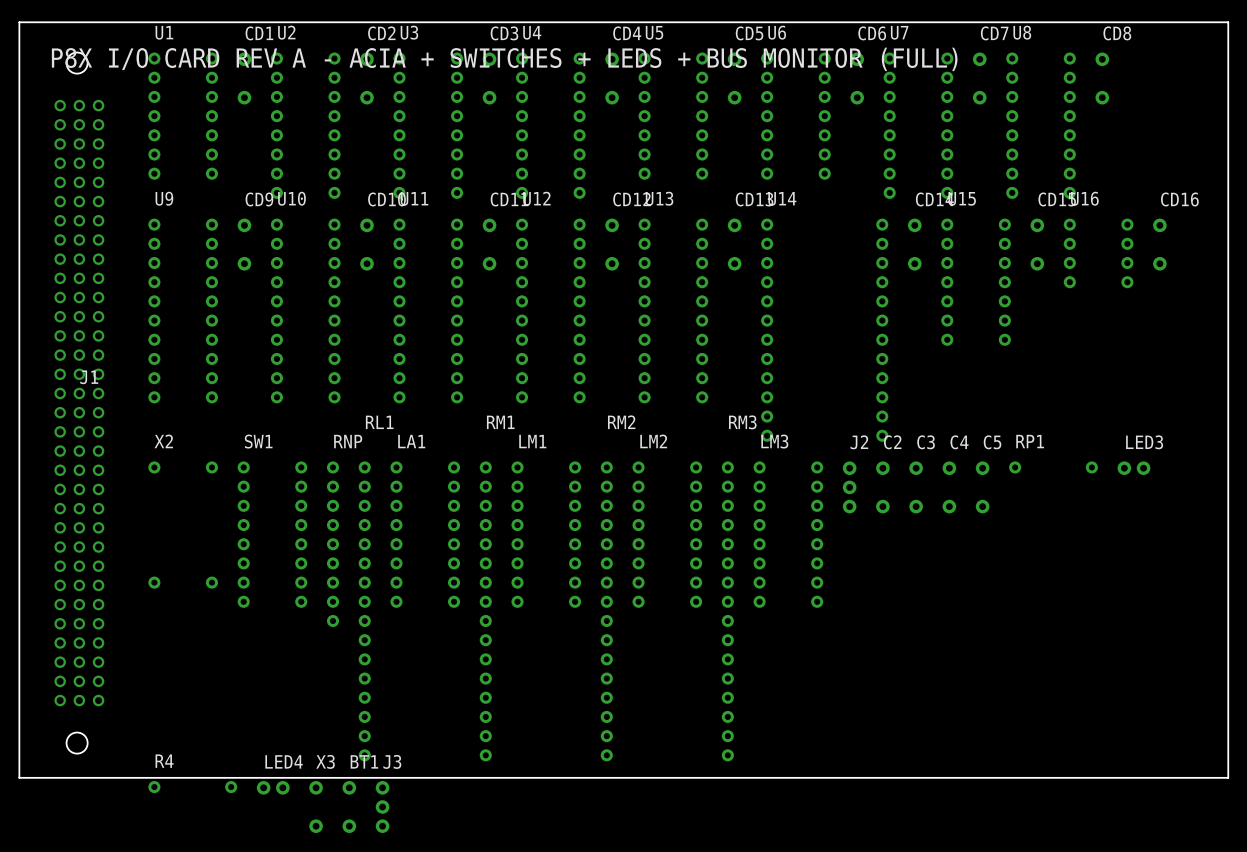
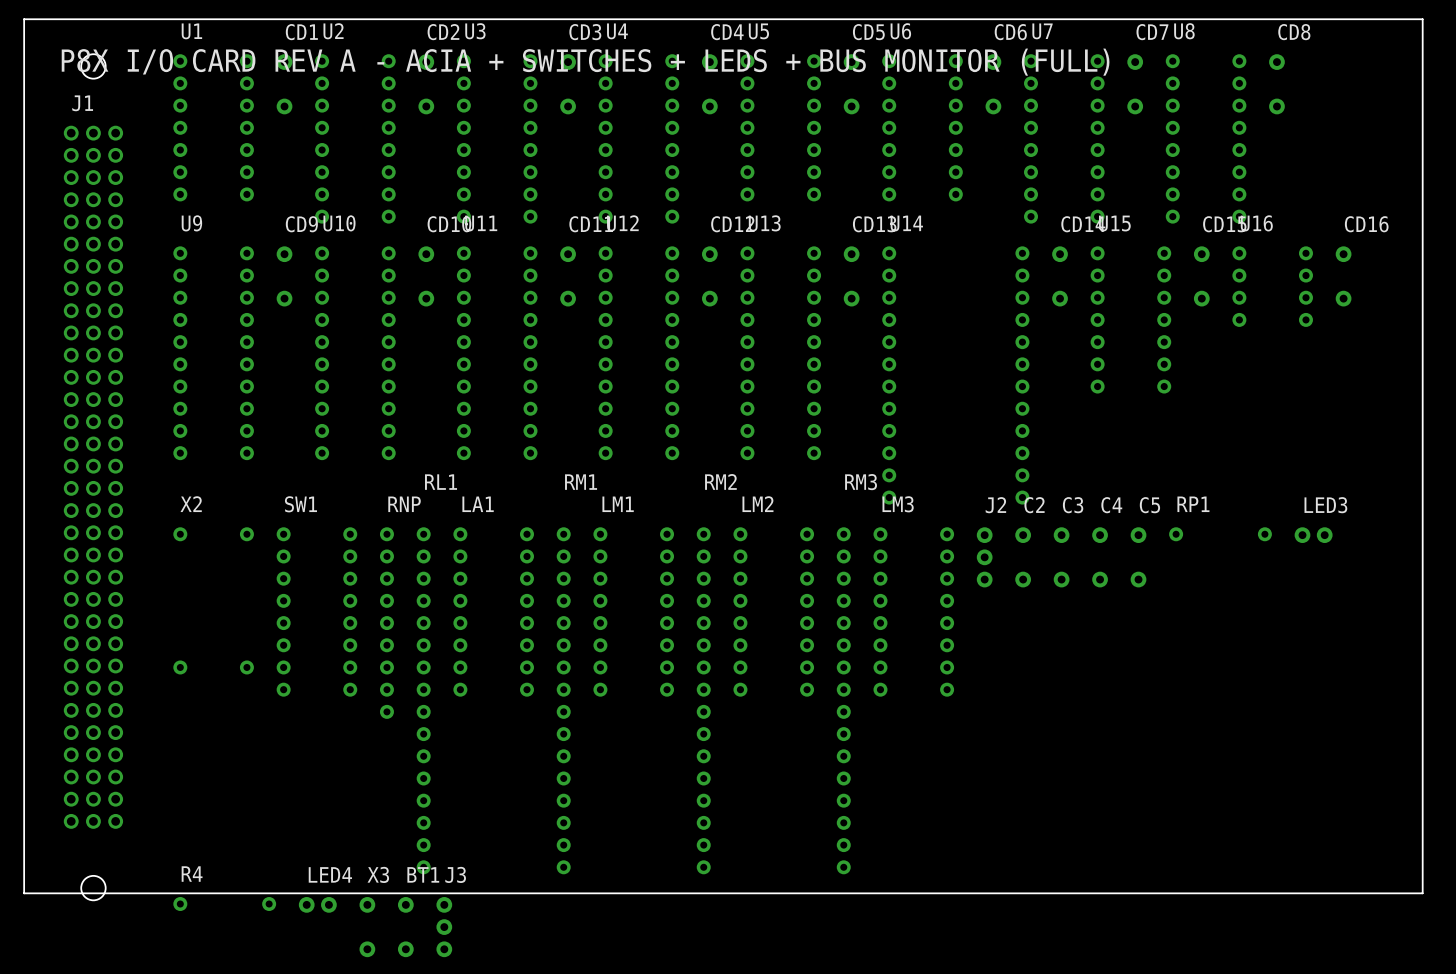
J1 footprint: [54, 52, 105, 754] -> [63, 54, 124, 901]
J1 name position: J1 (89, 377) -> J1 (82, 103)

